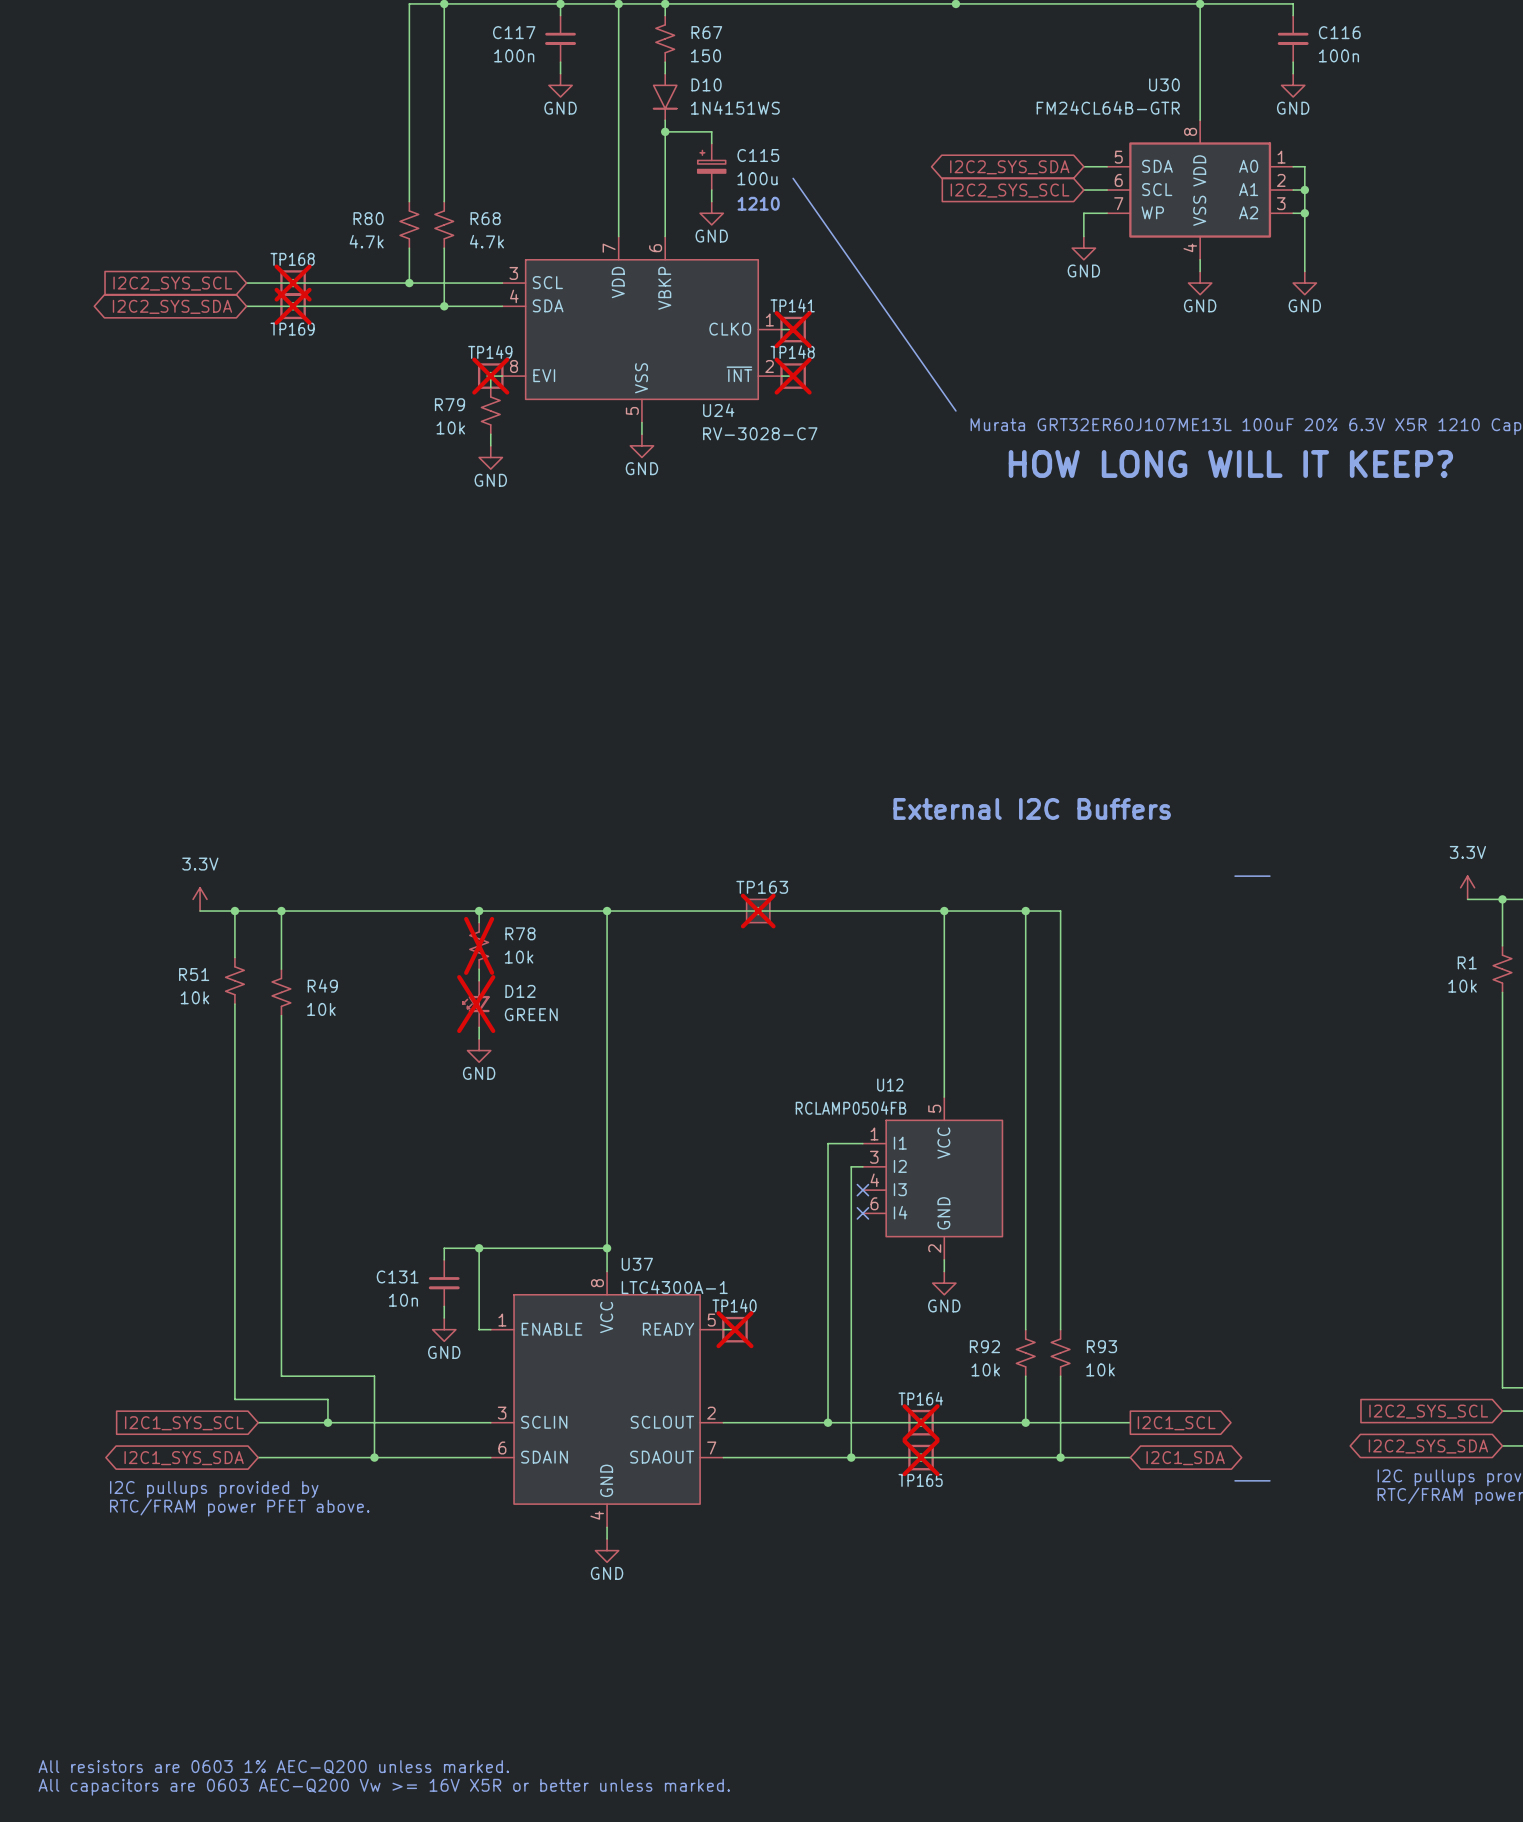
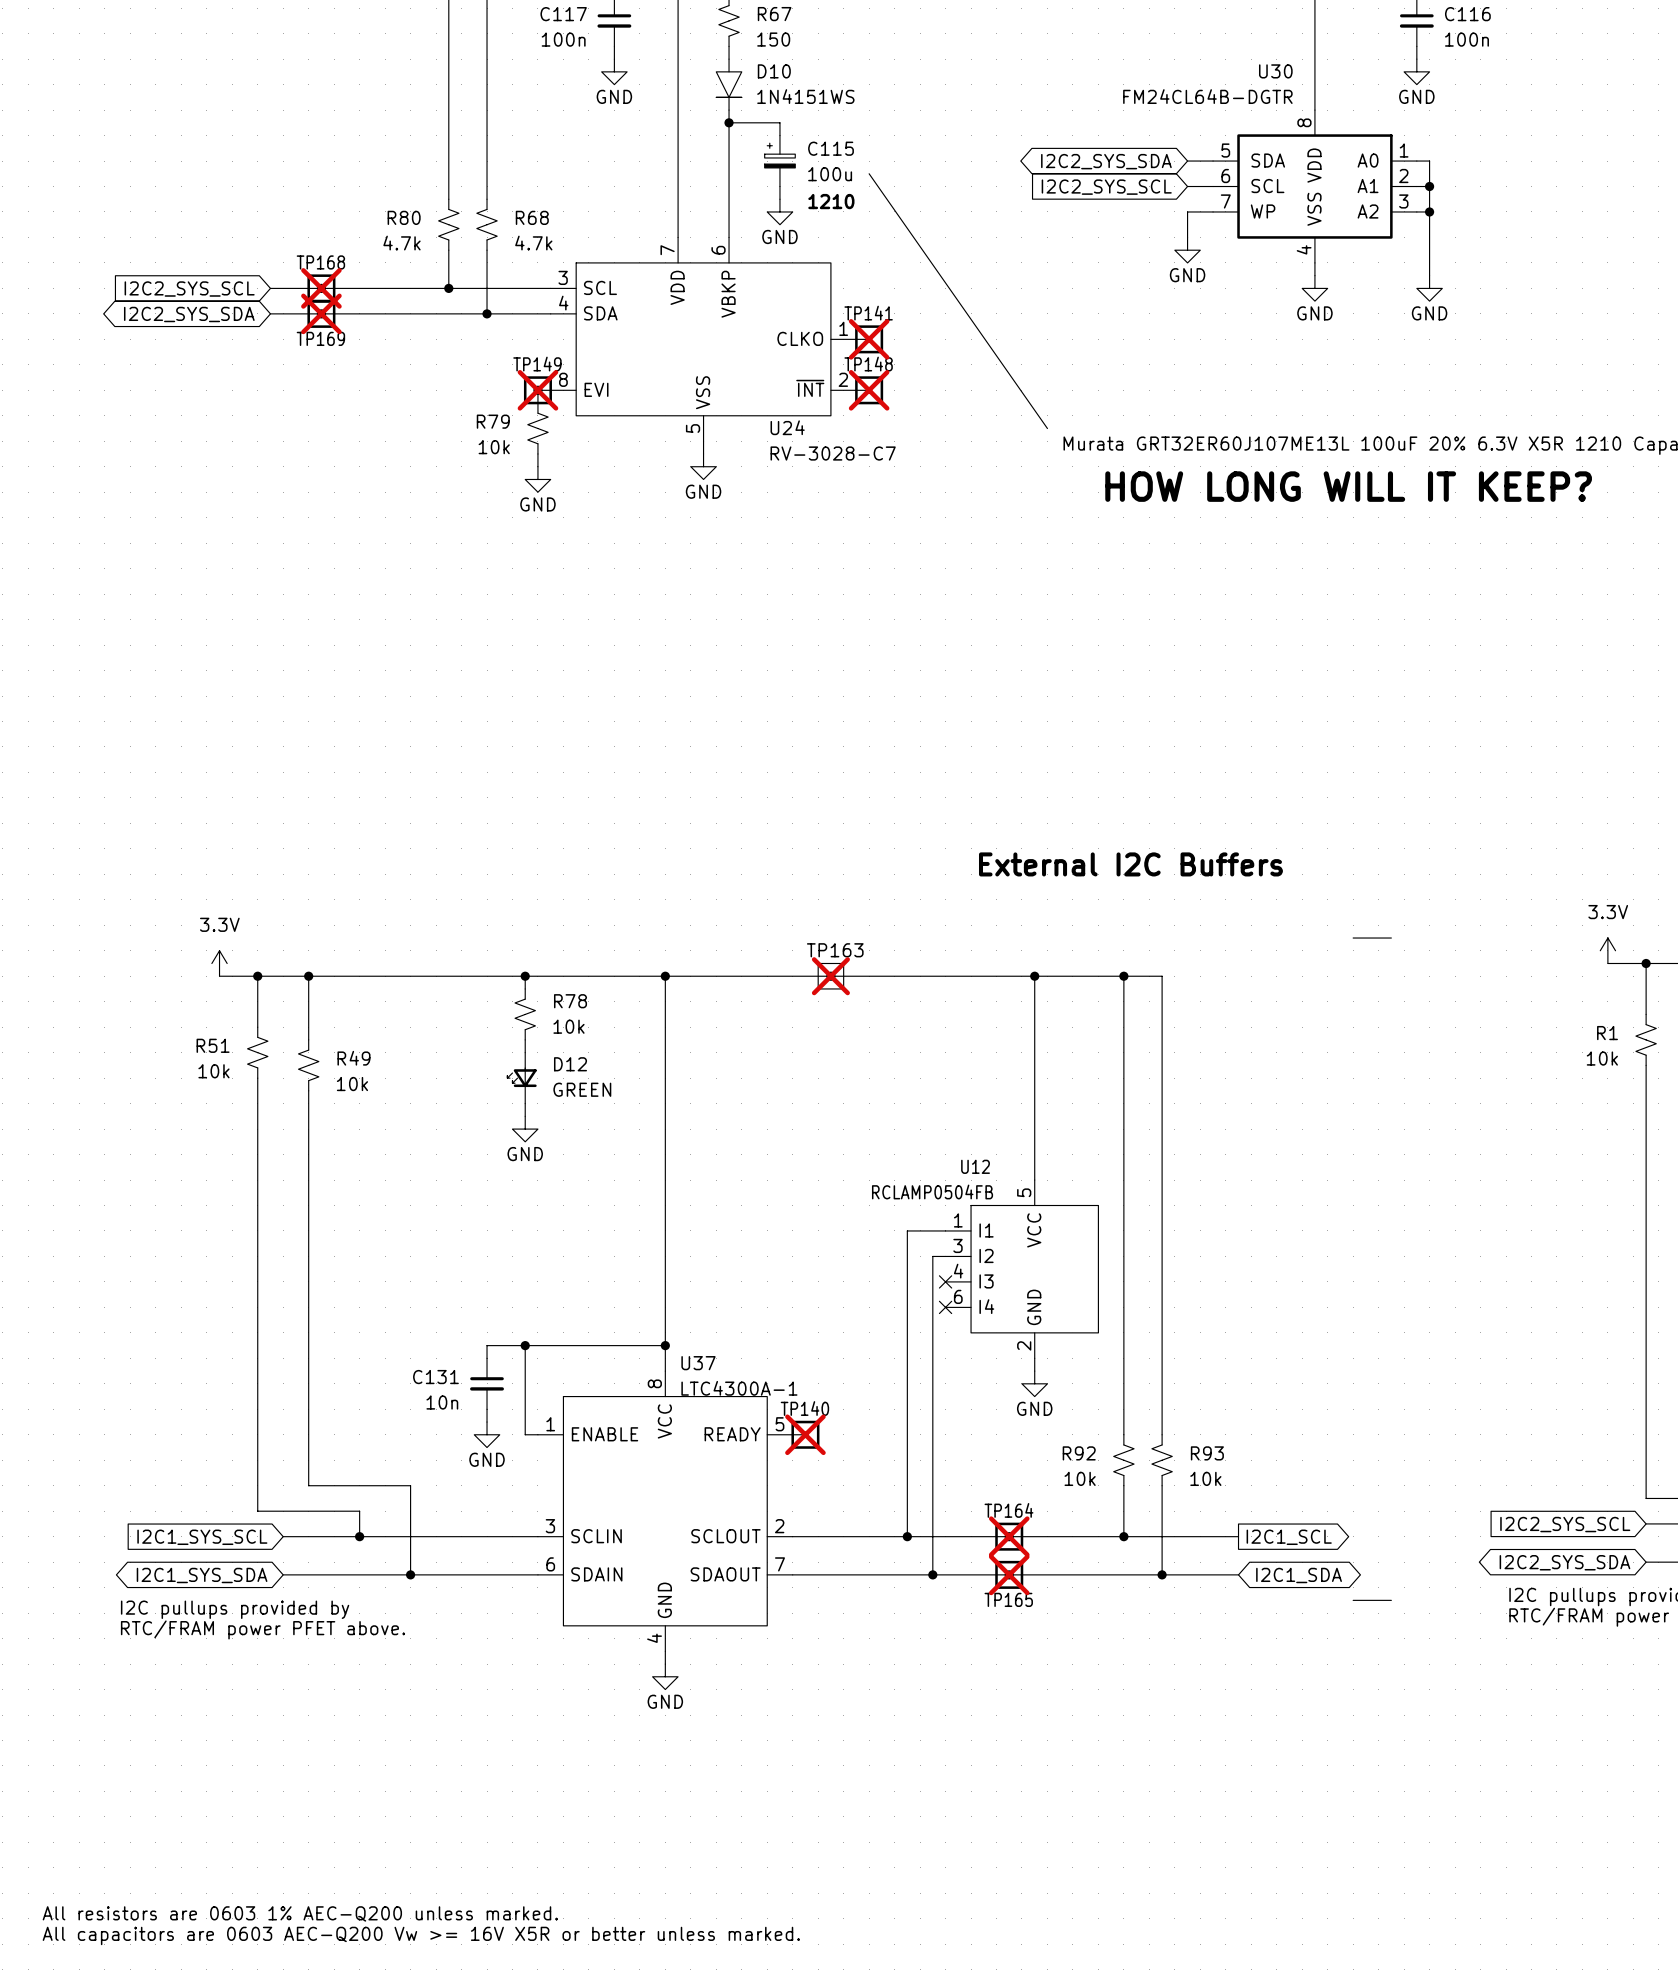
U30 value: FM24CL64B-GTR (1108, 107) -> FM24CL64B-DGTR (1207, 96)
R78 do-not-place cross: (479, 945) -> none
D12 do-not-place cross: (476, 1004) -> none

